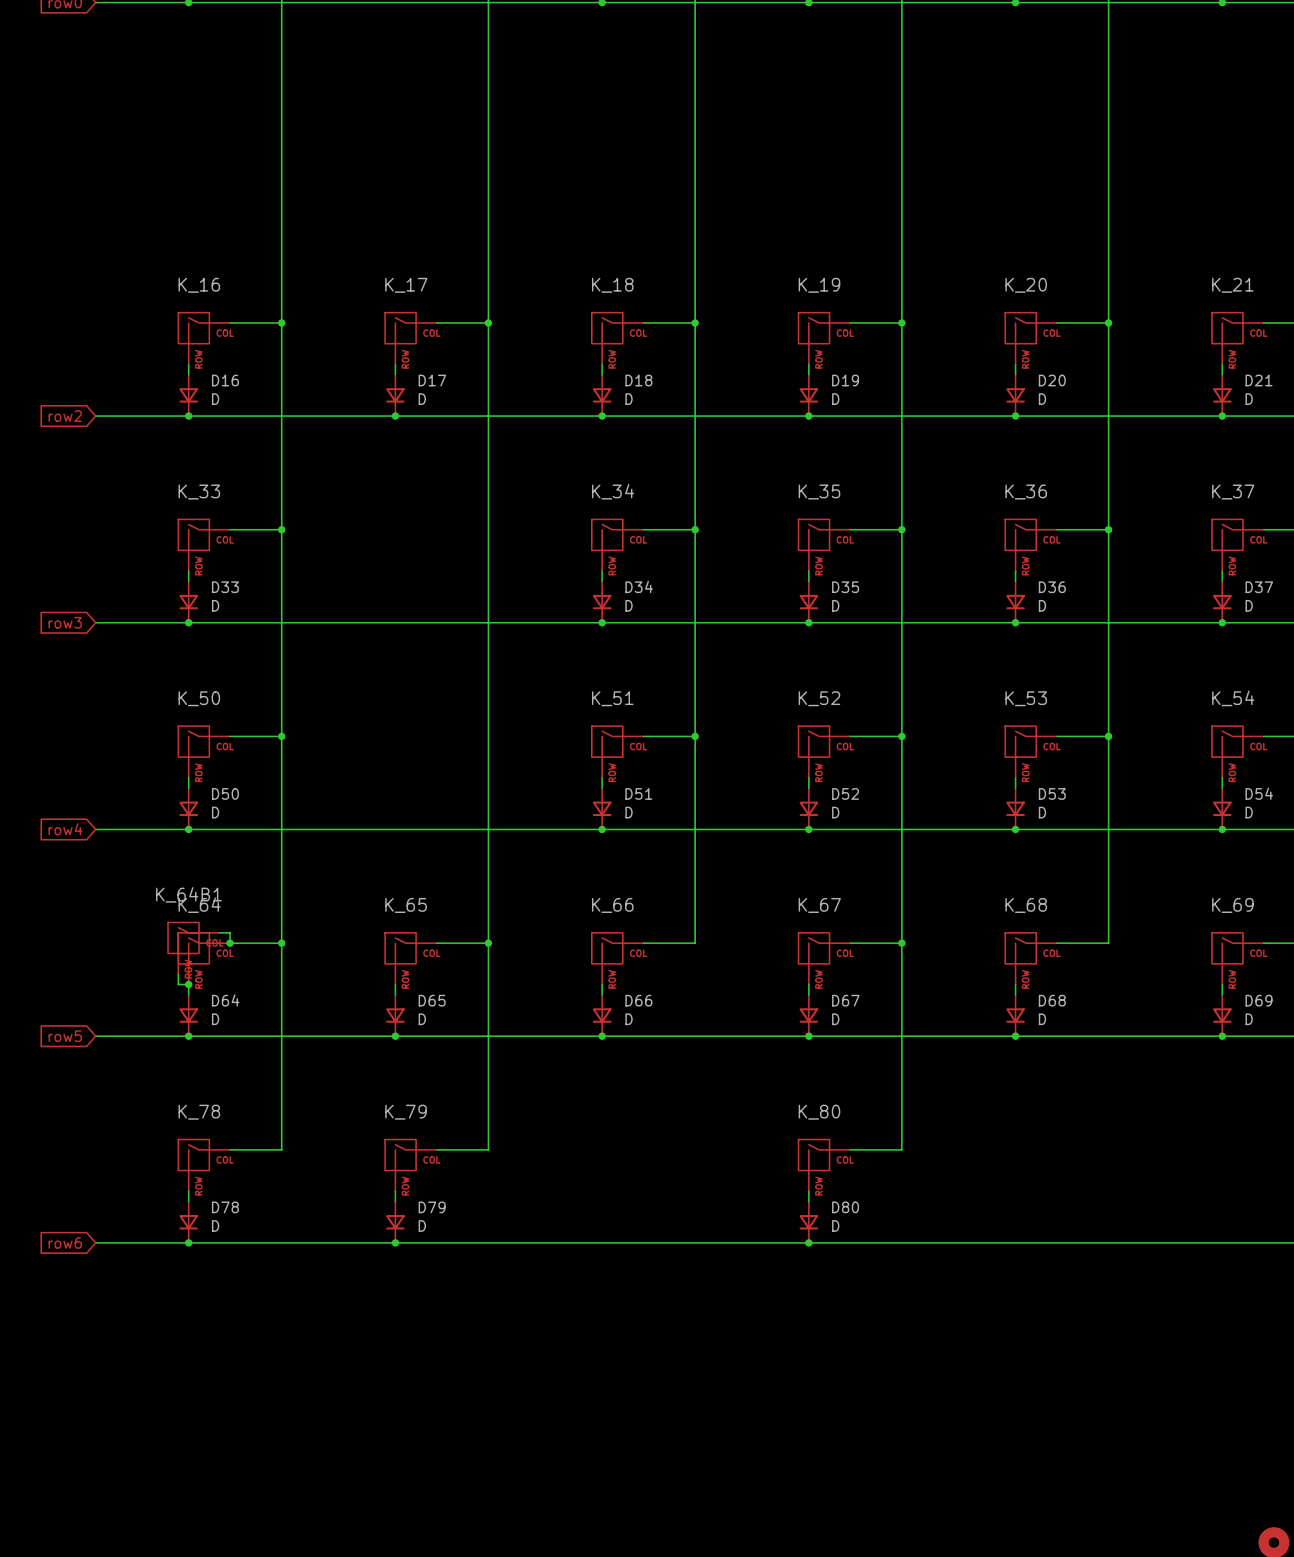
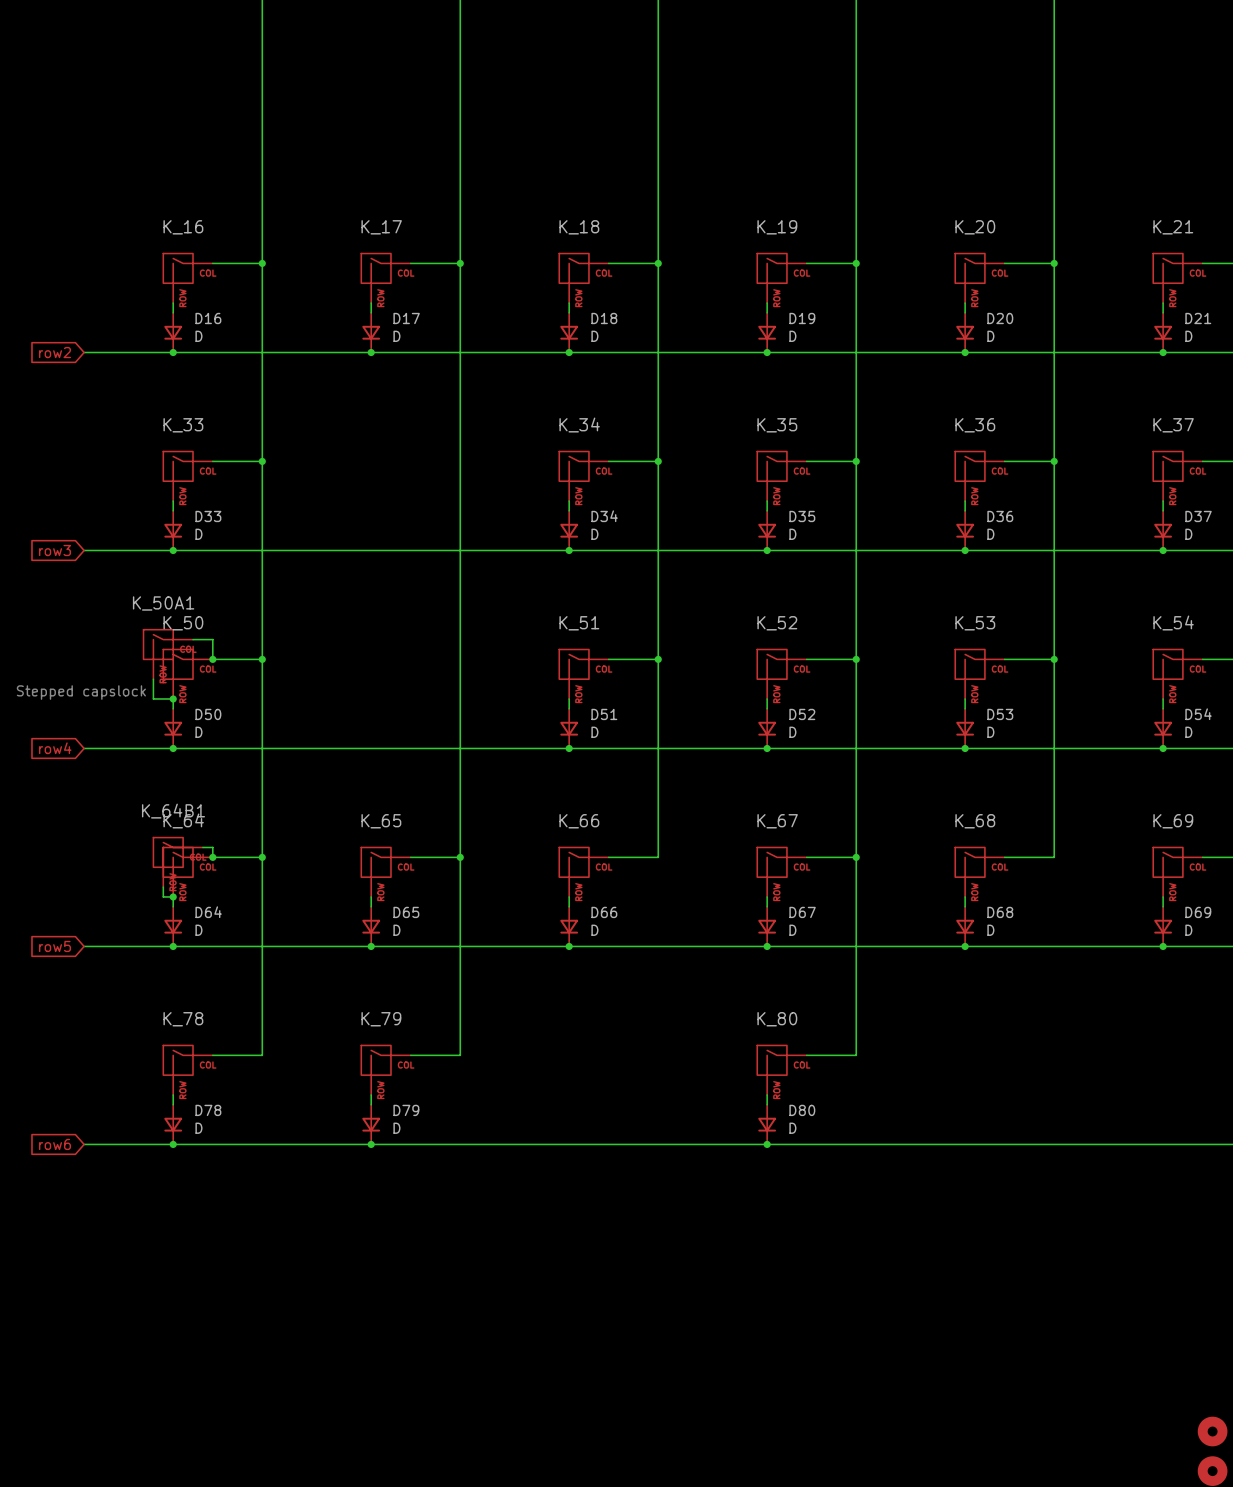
wire: none -> (193, 639) (212, 639) (212, 659)
K_50A1: none -> (168, 654)
junction: none -> (212, 659)
wire: none -> (153, 679) (153, 698) (173, 698)
text: none -> Stepped capslock (81, 692)
junction: none -> (173, 698)

